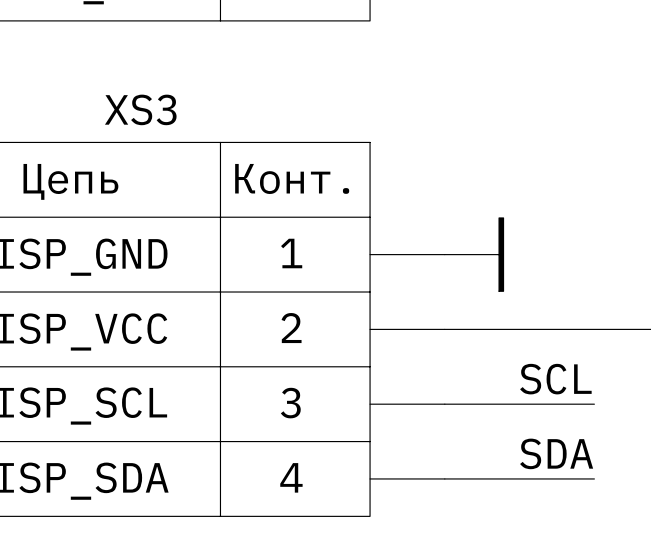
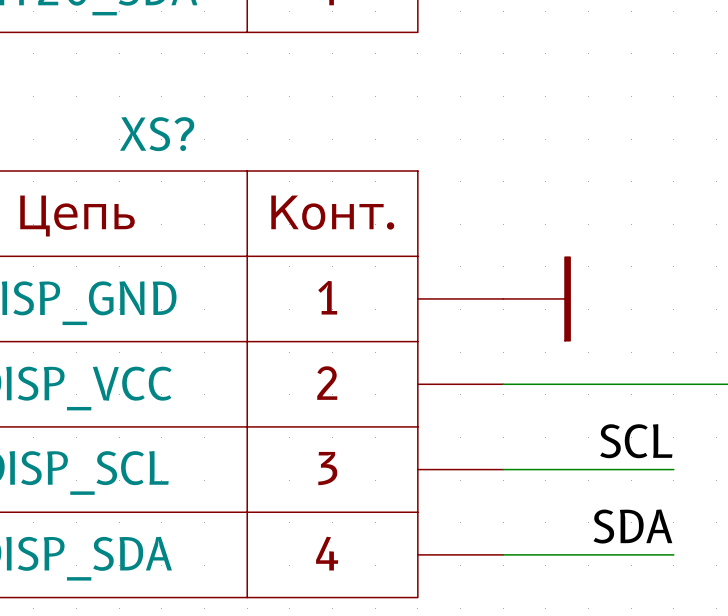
XS3 name: XS3 (140, 109) -> XS? (157, 134)

